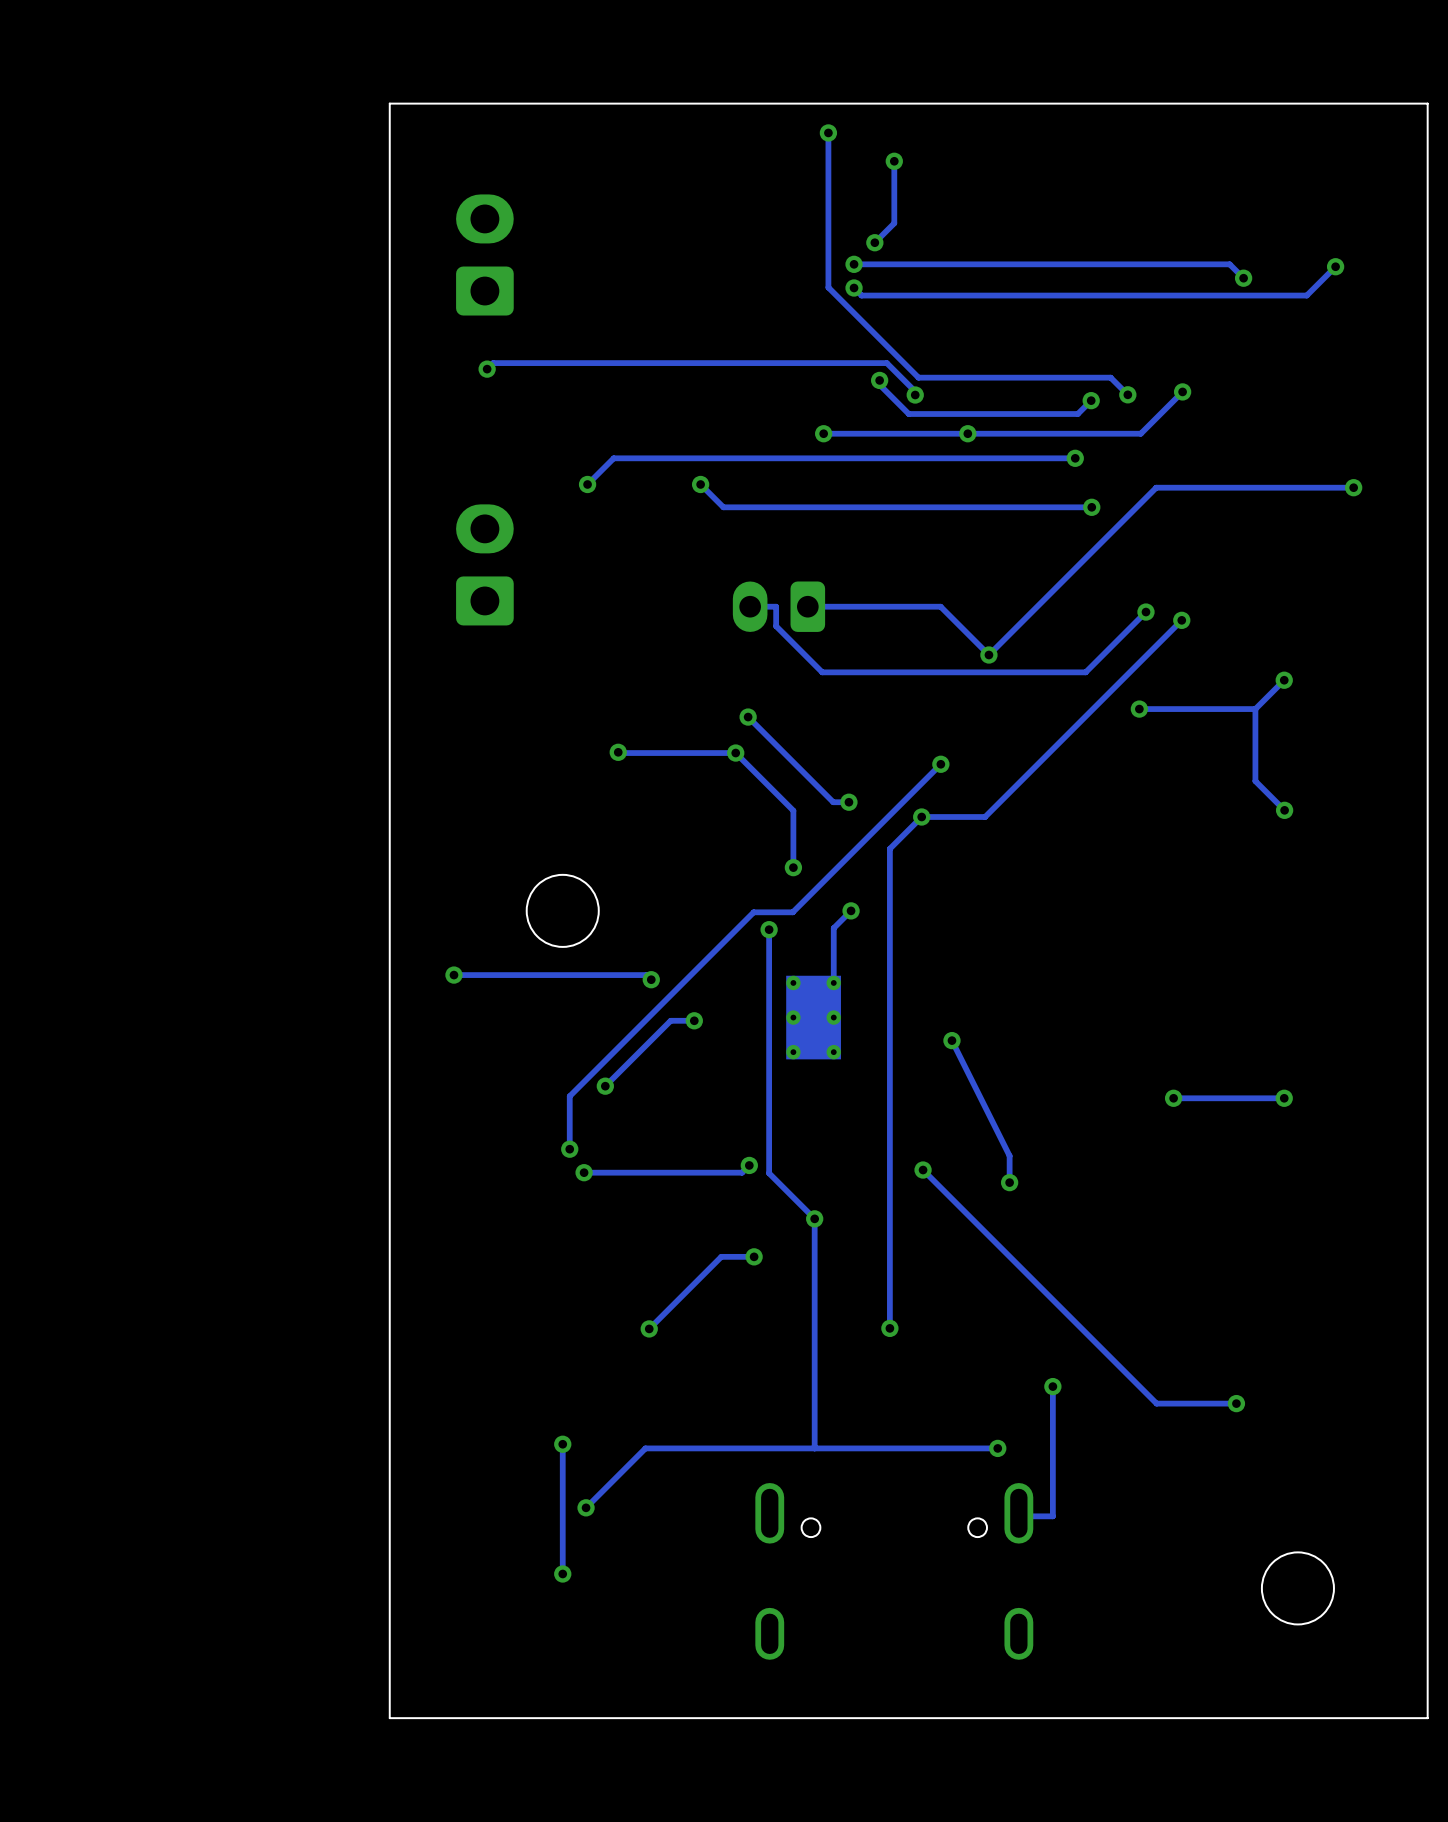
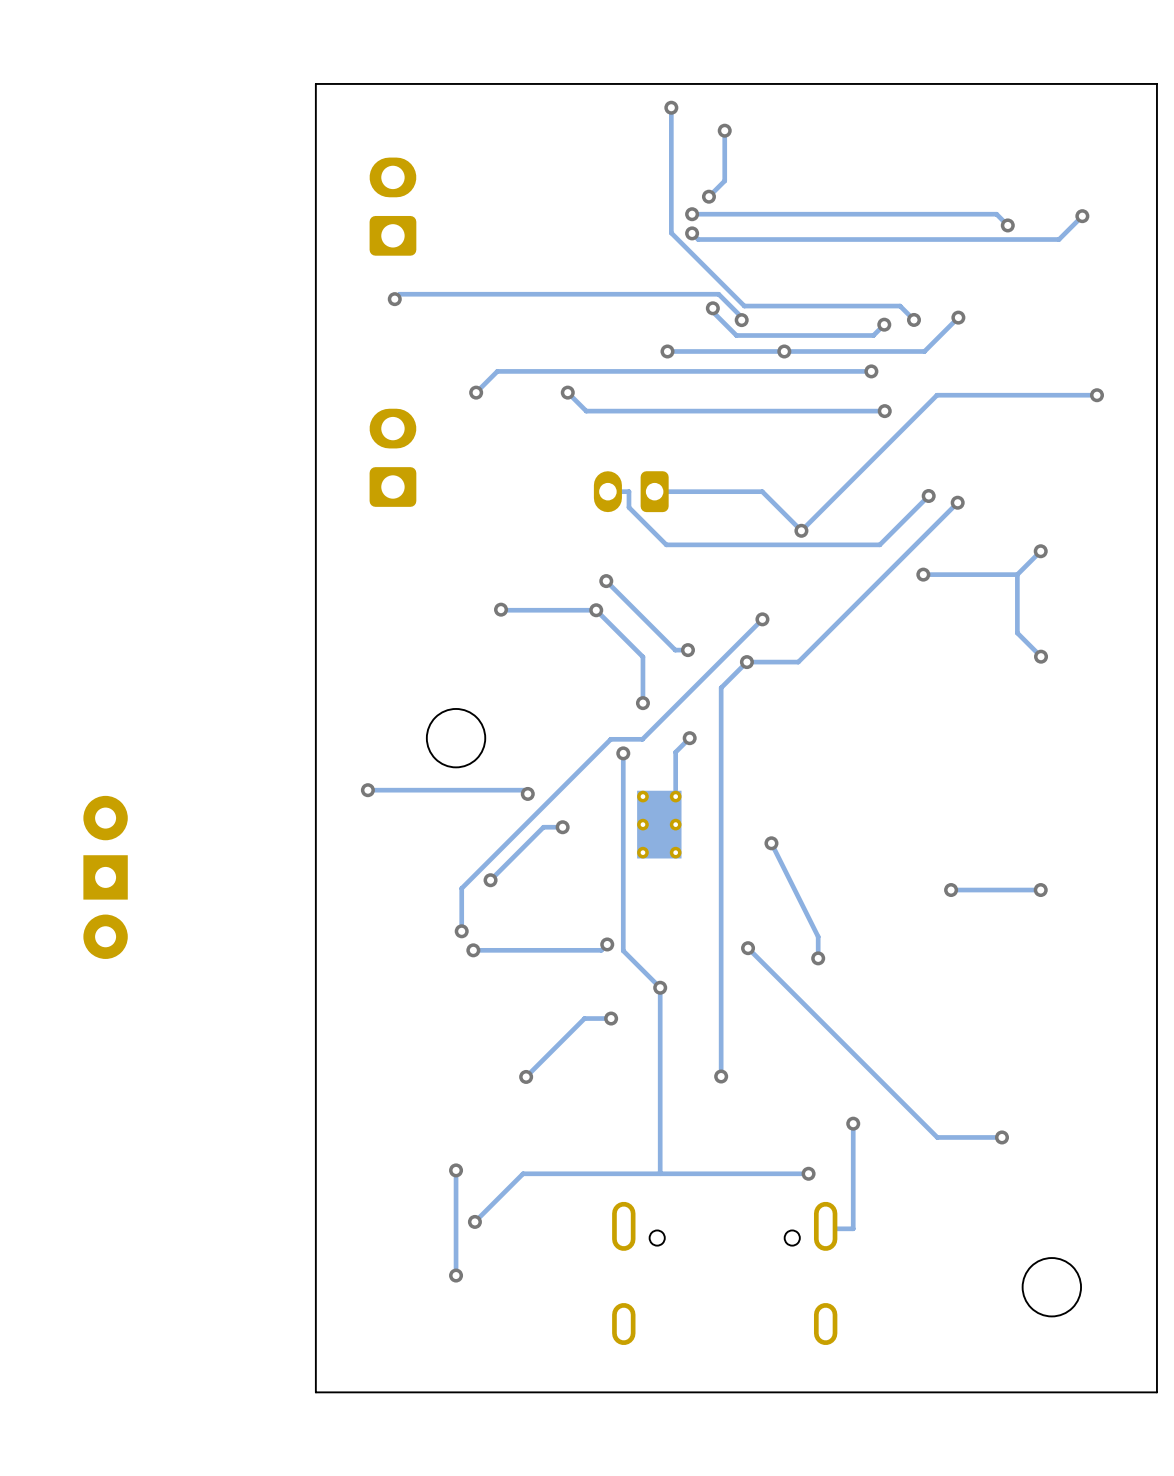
part: none -> (105, 877)

